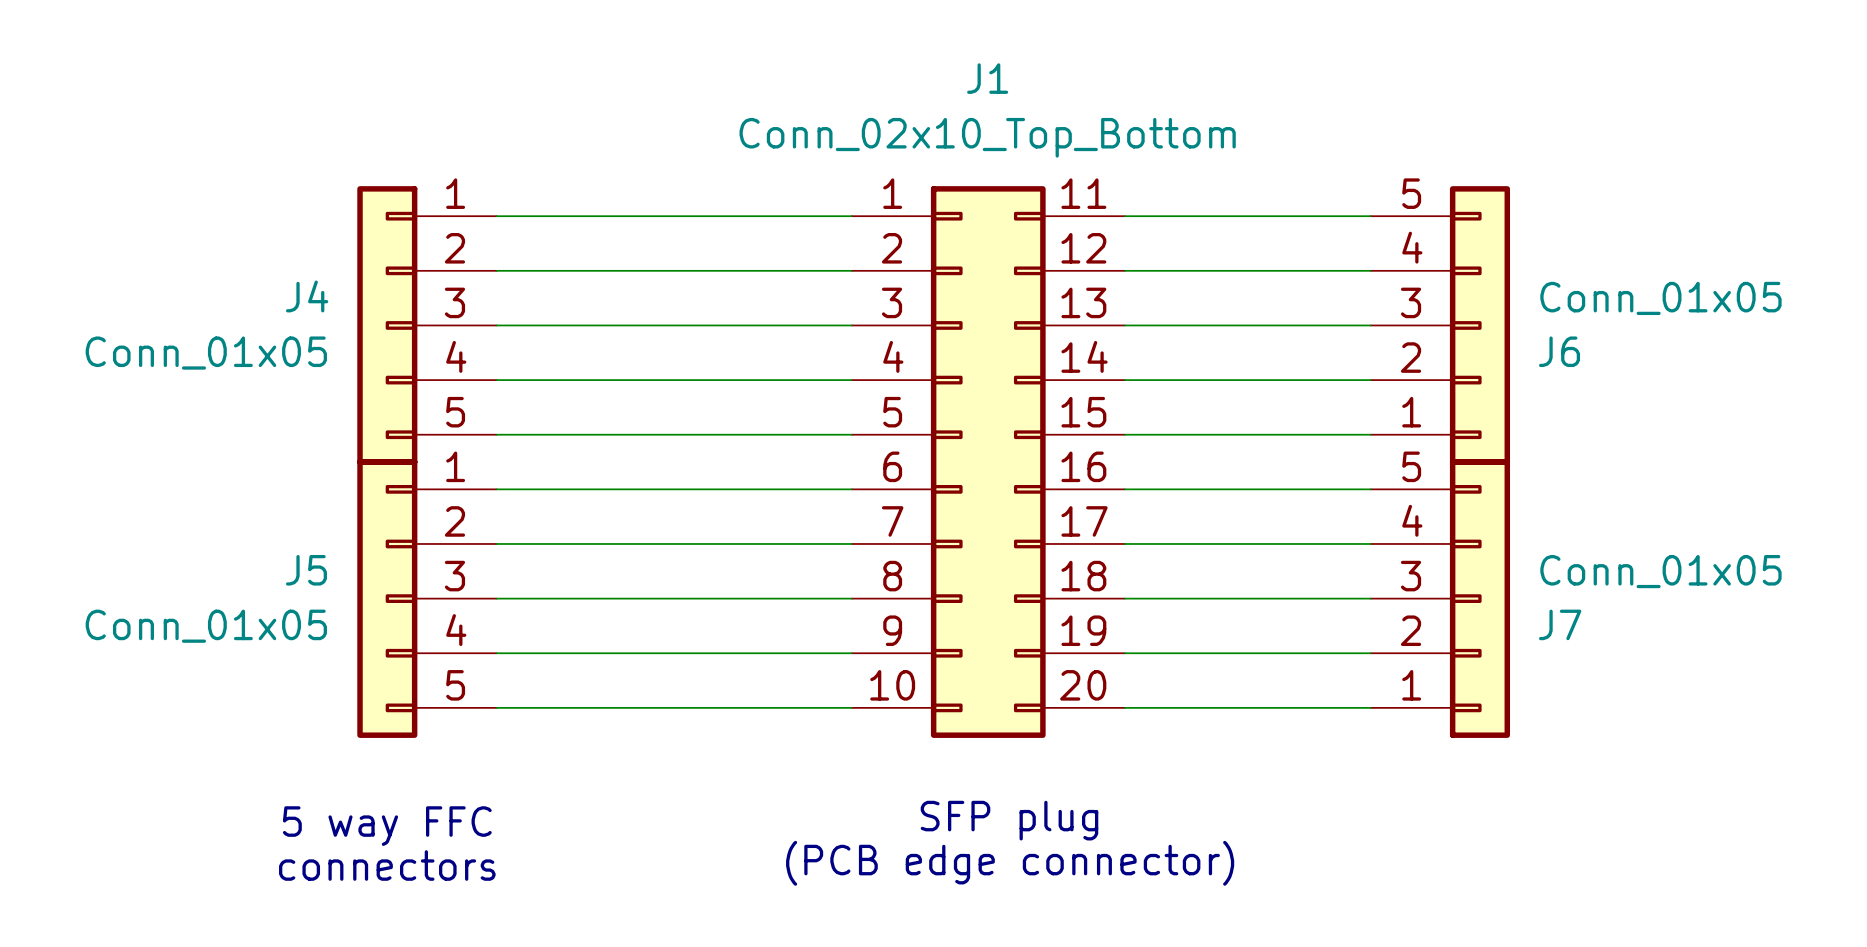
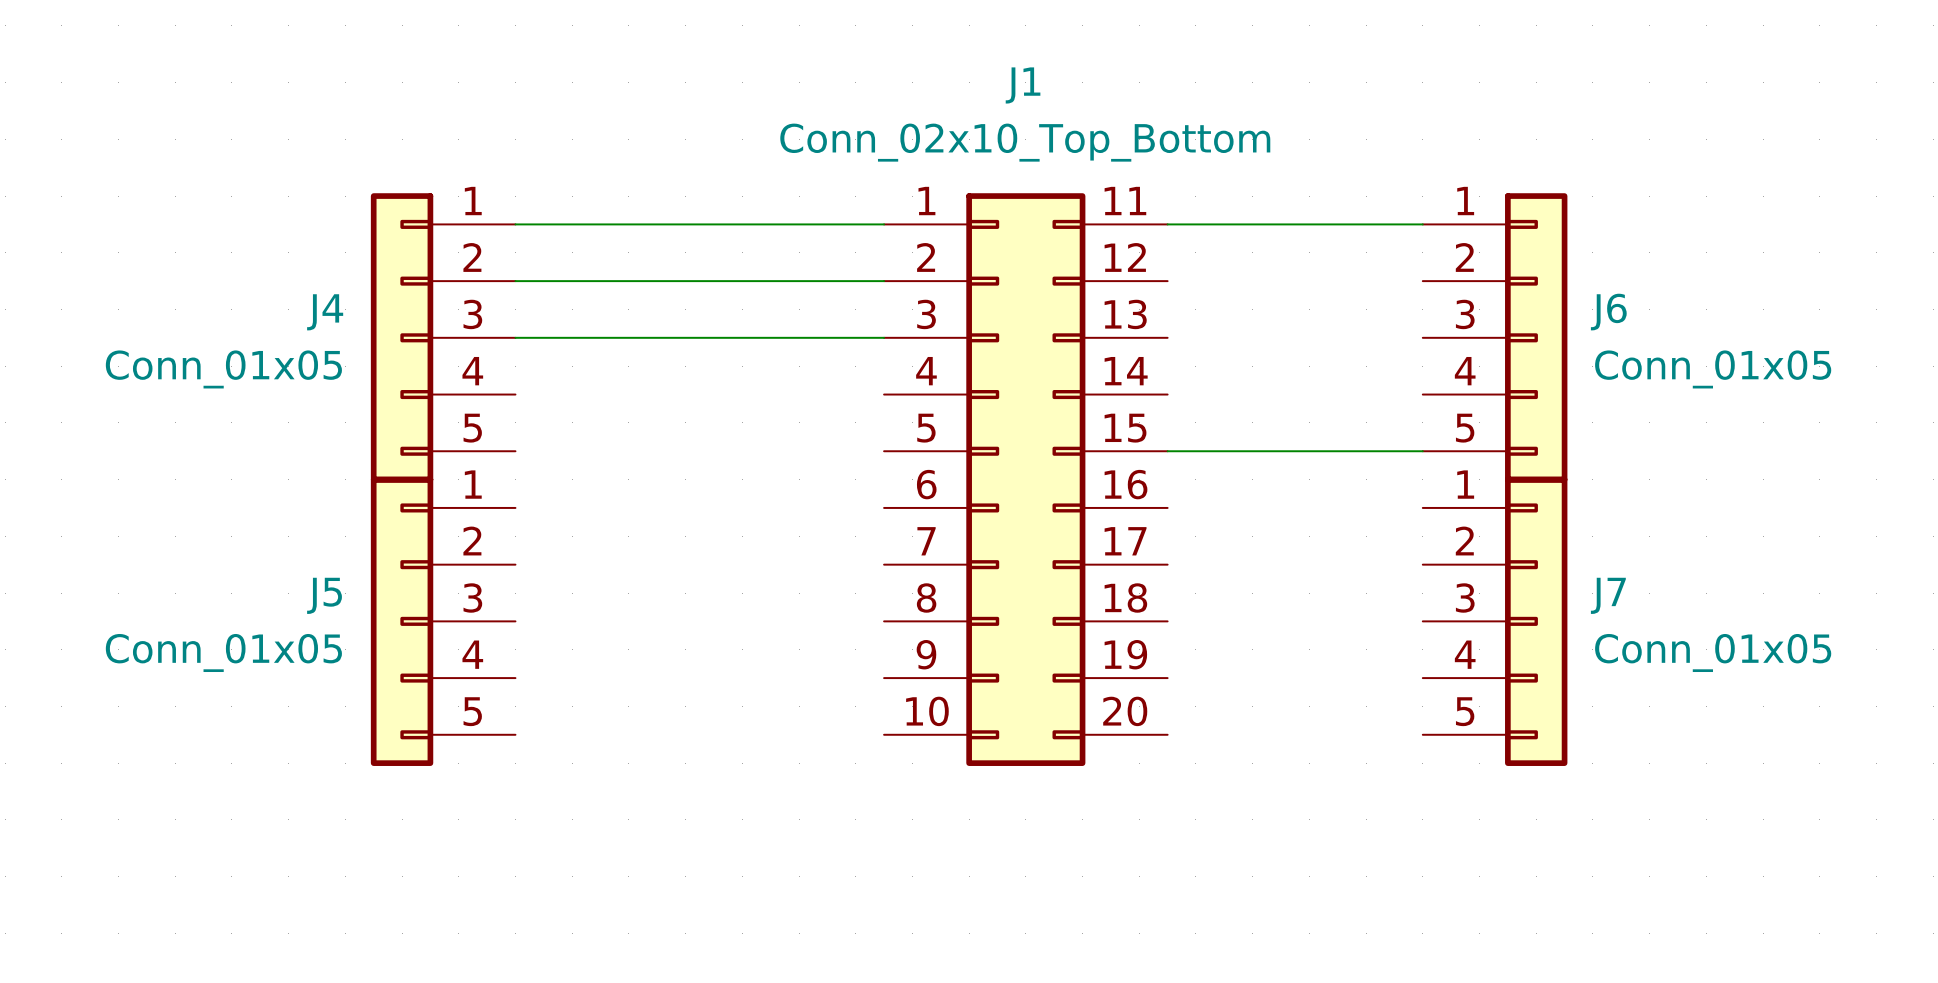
wire: (1124, 270) (1370, 270) -> none
wire: (1124, 325) (1370, 325) -> none
J6 flip: as is (1479, 325) -> up-down (1536, 337)
wire: (496, 380) (851, 380) -> none
wire: (1124, 380) (1370, 380) -> none
wire: (496, 434) (851, 434) -> none
wire: (496, 489) (851, 489) -> none
wire: (1124, 489) (1370, 489) -> none
wire: (496, 543) (851, 543) -> none
wire: (1124, 543) (1370, 543) -> none
wire: (496, 598) (851, 598) -> none
wire: (1124, 598) (1370, 598) -> none
J7 flip: as is (1479, 598) -> up-down (1536, 621)
wire: (496, 653) (851, 653) -> none
wire: (1124, 653) (1370, 653) -> none
wire: (496, 707) (851, 707) -> none
wire: (1124, 707) (1370, 707) -> none
text: SFP plug (1009, 820) -> none
text: 5 way FFC (387, 826) -> none
text: (PCB edge connector) (1010, 863) -> none
text: connectors (387, 865) -> none

